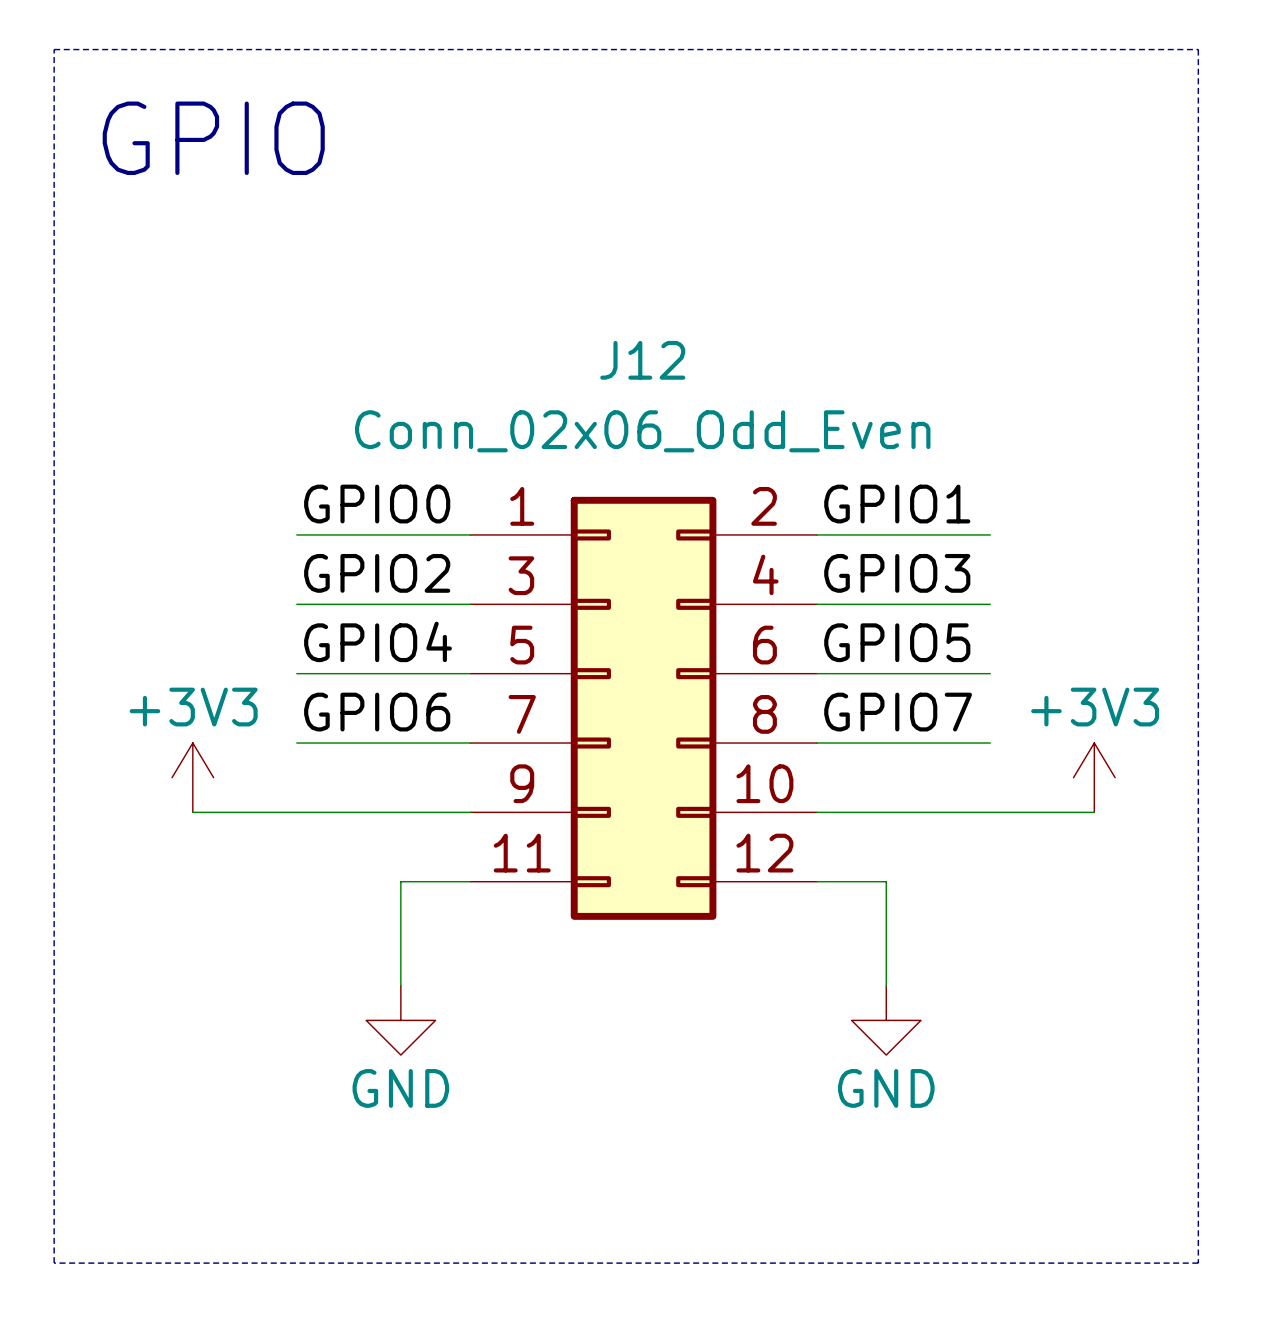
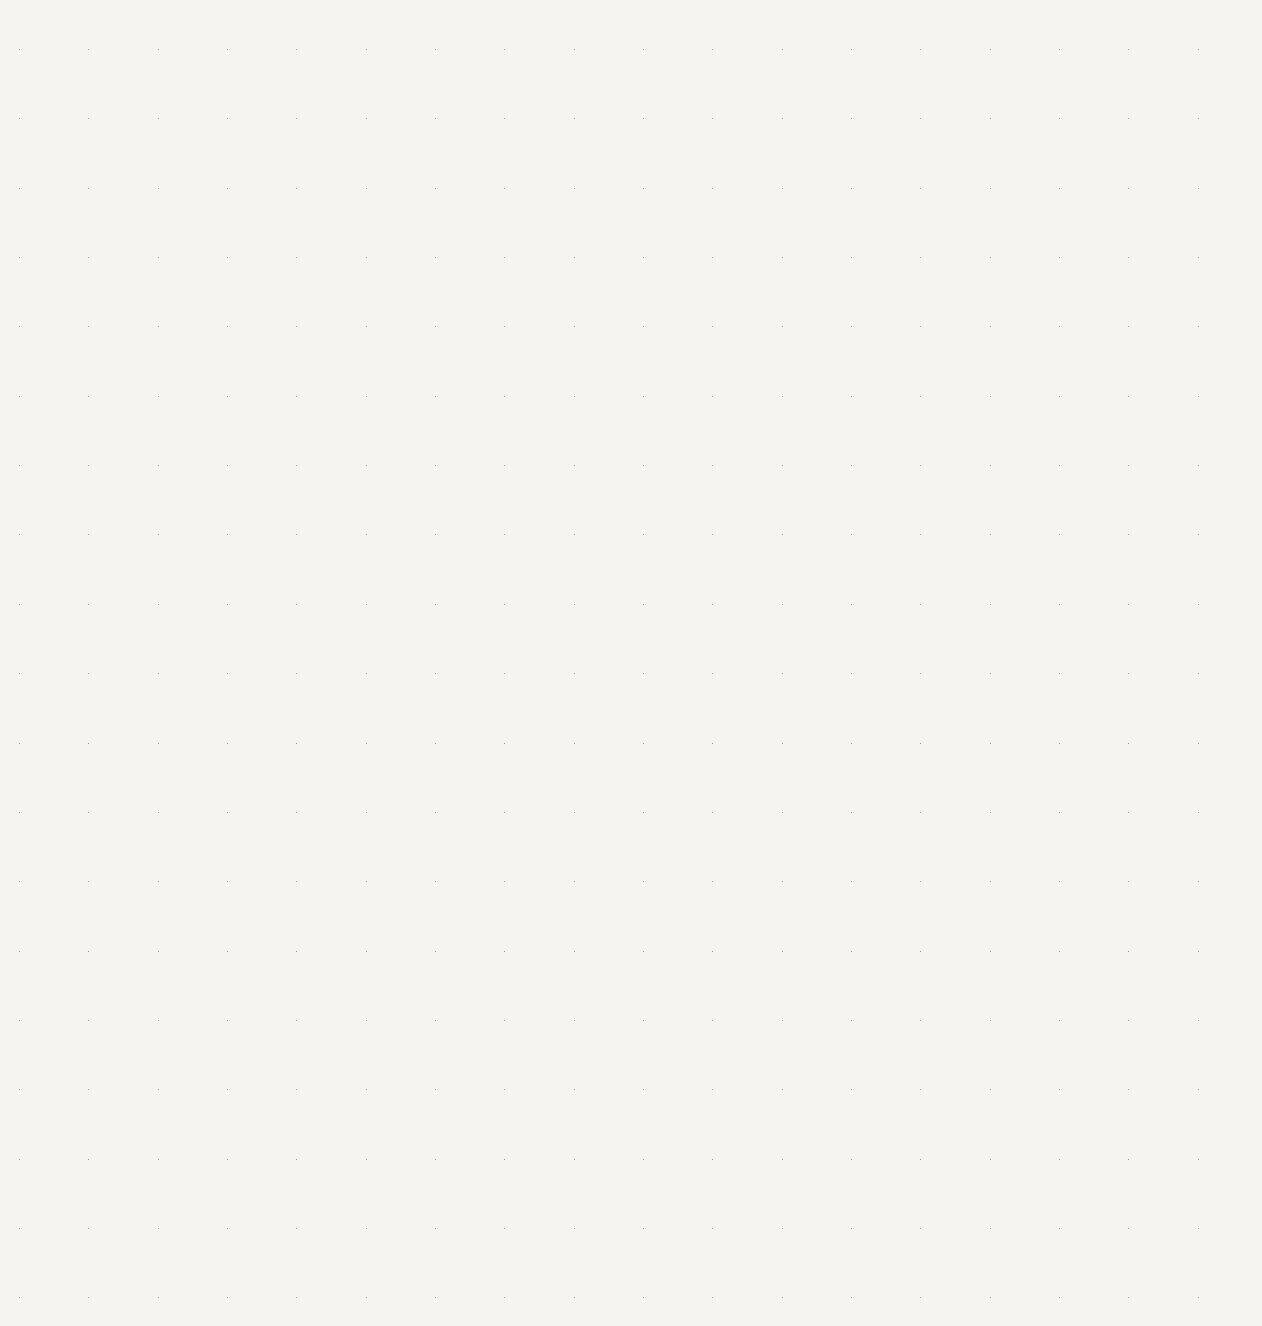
line: (54, 49) (1198, 49) (1198, 1263) (54, 1263) (54, 49) -> none
text: GPIO (213, 138) -> none
label: GPIO0 (377, 504) -> none
label: GPIO1 (897, 504) -> none
wire: (296, 534) (470, 534) -> none
wire: (816, 534) (990, 534) -> none
label: GPIO2 (377, 573) -> none
label: GPIO3 (897, 573) -> none
wire: (296, 604) (470, 604) -> none
wire: (816, 604) (990, 604) -> none
label: GPIO4 (378, 641) -> none
label: GPIO5 (897, 642) -> none
wire: (296, 673) (470, 673) -> none
wire: (816, 673) (990, 673) -> none
J12: Conn_02x06_Odd_Even (643, 708) -> none
label: GPIO6 (377, 712) -> none
label: GPIO7 (898, 712) -> none
wire: (296, 743) (470, 743) -> none
wire: (816, 743) (990, 743) -> none
power symbol: +3V3 (192, 777) -> none
power symbol: +3V3 (1094, 777) -> none
wire: (192, 812) (470, 812) -> none
wire: (816, 812) (1094, 812) -> none
wire: (470, 881) (400, 881) (400, 985) -> none
wire: (816, 881) (886, 881) (886, 985) -> none
power symbol: GND (400, 1020) -> none
power symbol: GND (886, 1020) -> none

